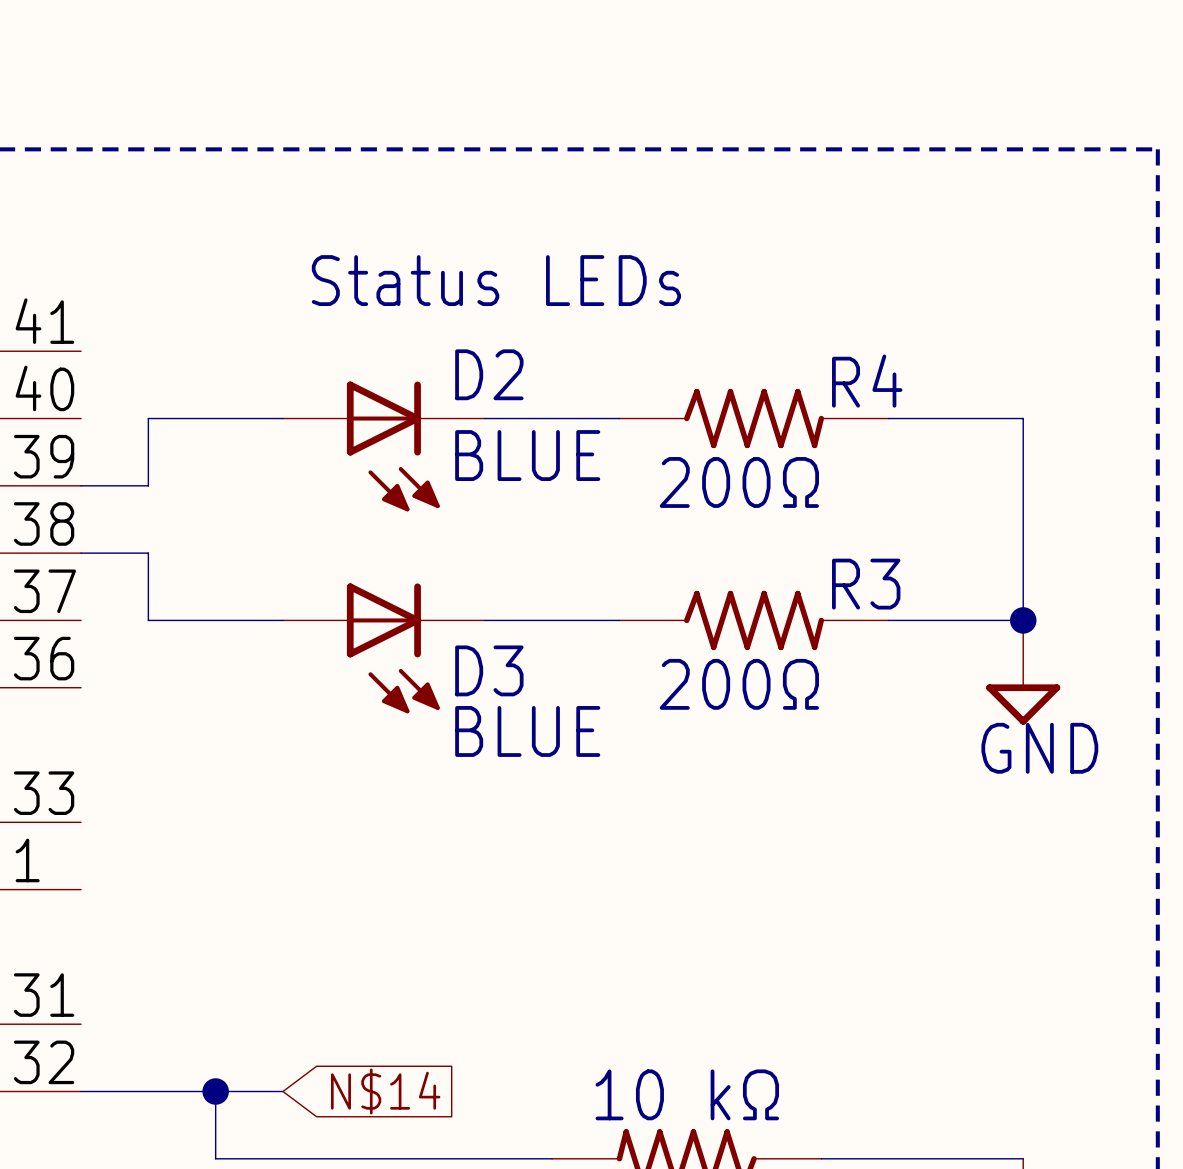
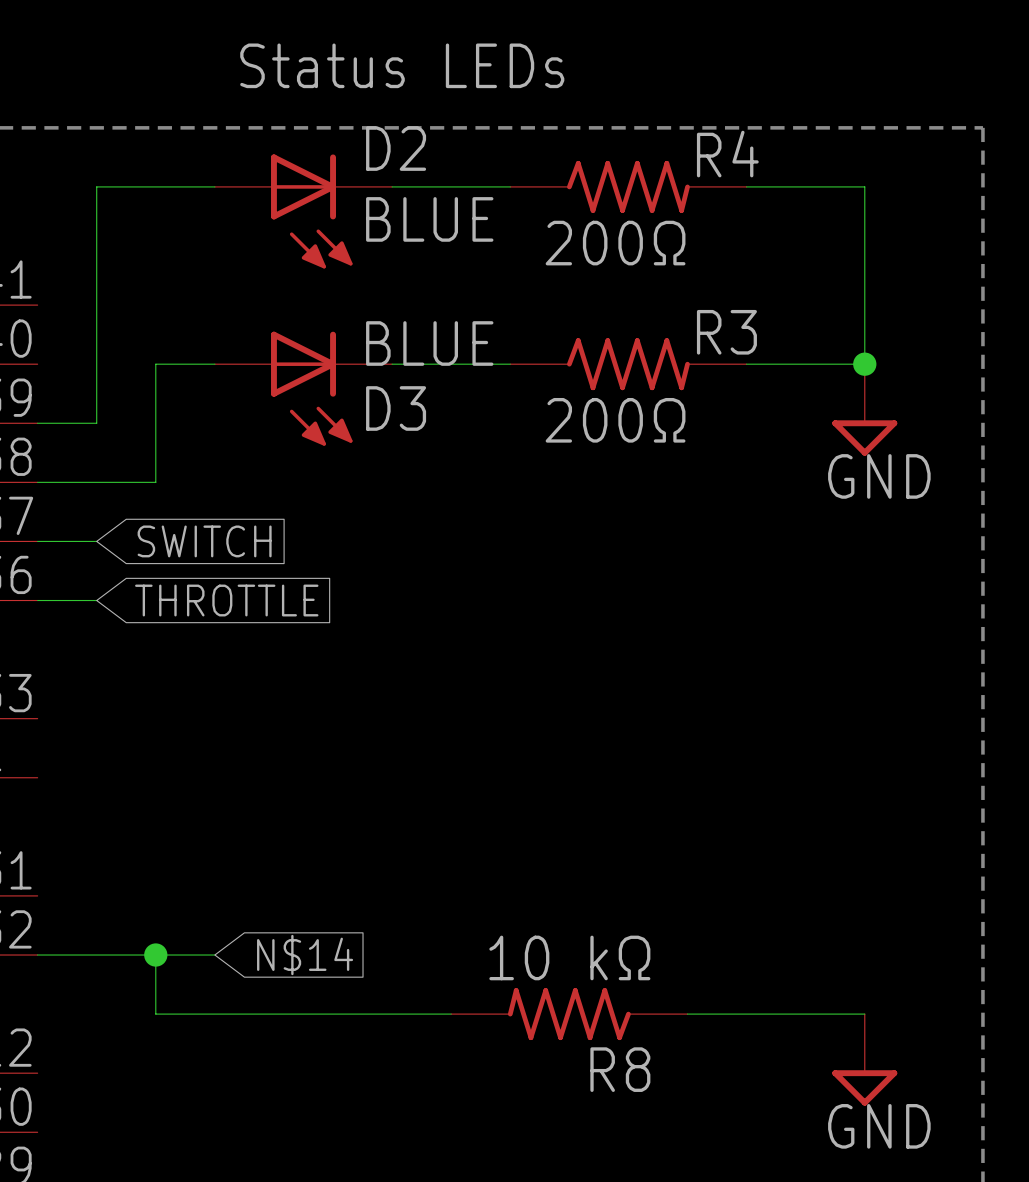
wire: none -> (214, 186) (96, 186) (96, 364)
R4: none -> 200Ω (628, 186)
D2: none -> (303, 211)
text: none -> BLUE (429, 219)
text position: Status LEDs (496, 280) -> Status LEDs (402, 65)
D2 name: D2 (489, 374) -> D3 (396, 408)
R4 name: R4 (867, 381) -> R3 (726, 332)
wire: (148, 418) (215, 418) -> (96, 482) (155, 482) (155, 364)
wire: (1023, 418) (1023, 620) (888, 620) -> (864, 364) (864, 186) (746, 186)
junction: none -> (864, 364)
text position: BLUE (527, 455) -> BLUE (429, 343)
wire: (148, 553) (148, 620) (282, 620) -> none
wire: none -> (37, 541) (96, 541)
global label: none -> SWITCH (204, 541)
wire: (484, 620) (619, 620) -> (392, 186) (510, 186)
R3: 200Ω (754, 620) -> none
junction: (1023, 620) -> none
D3: (383, 648) -> none
power symbol position: GND (1023, 672) -> GND (864, 409)
wire: none -> (37, 600) (96, 600)
global label: none -> THROTTLE (226, 600)
text: BLUE (527, 731) -> none

